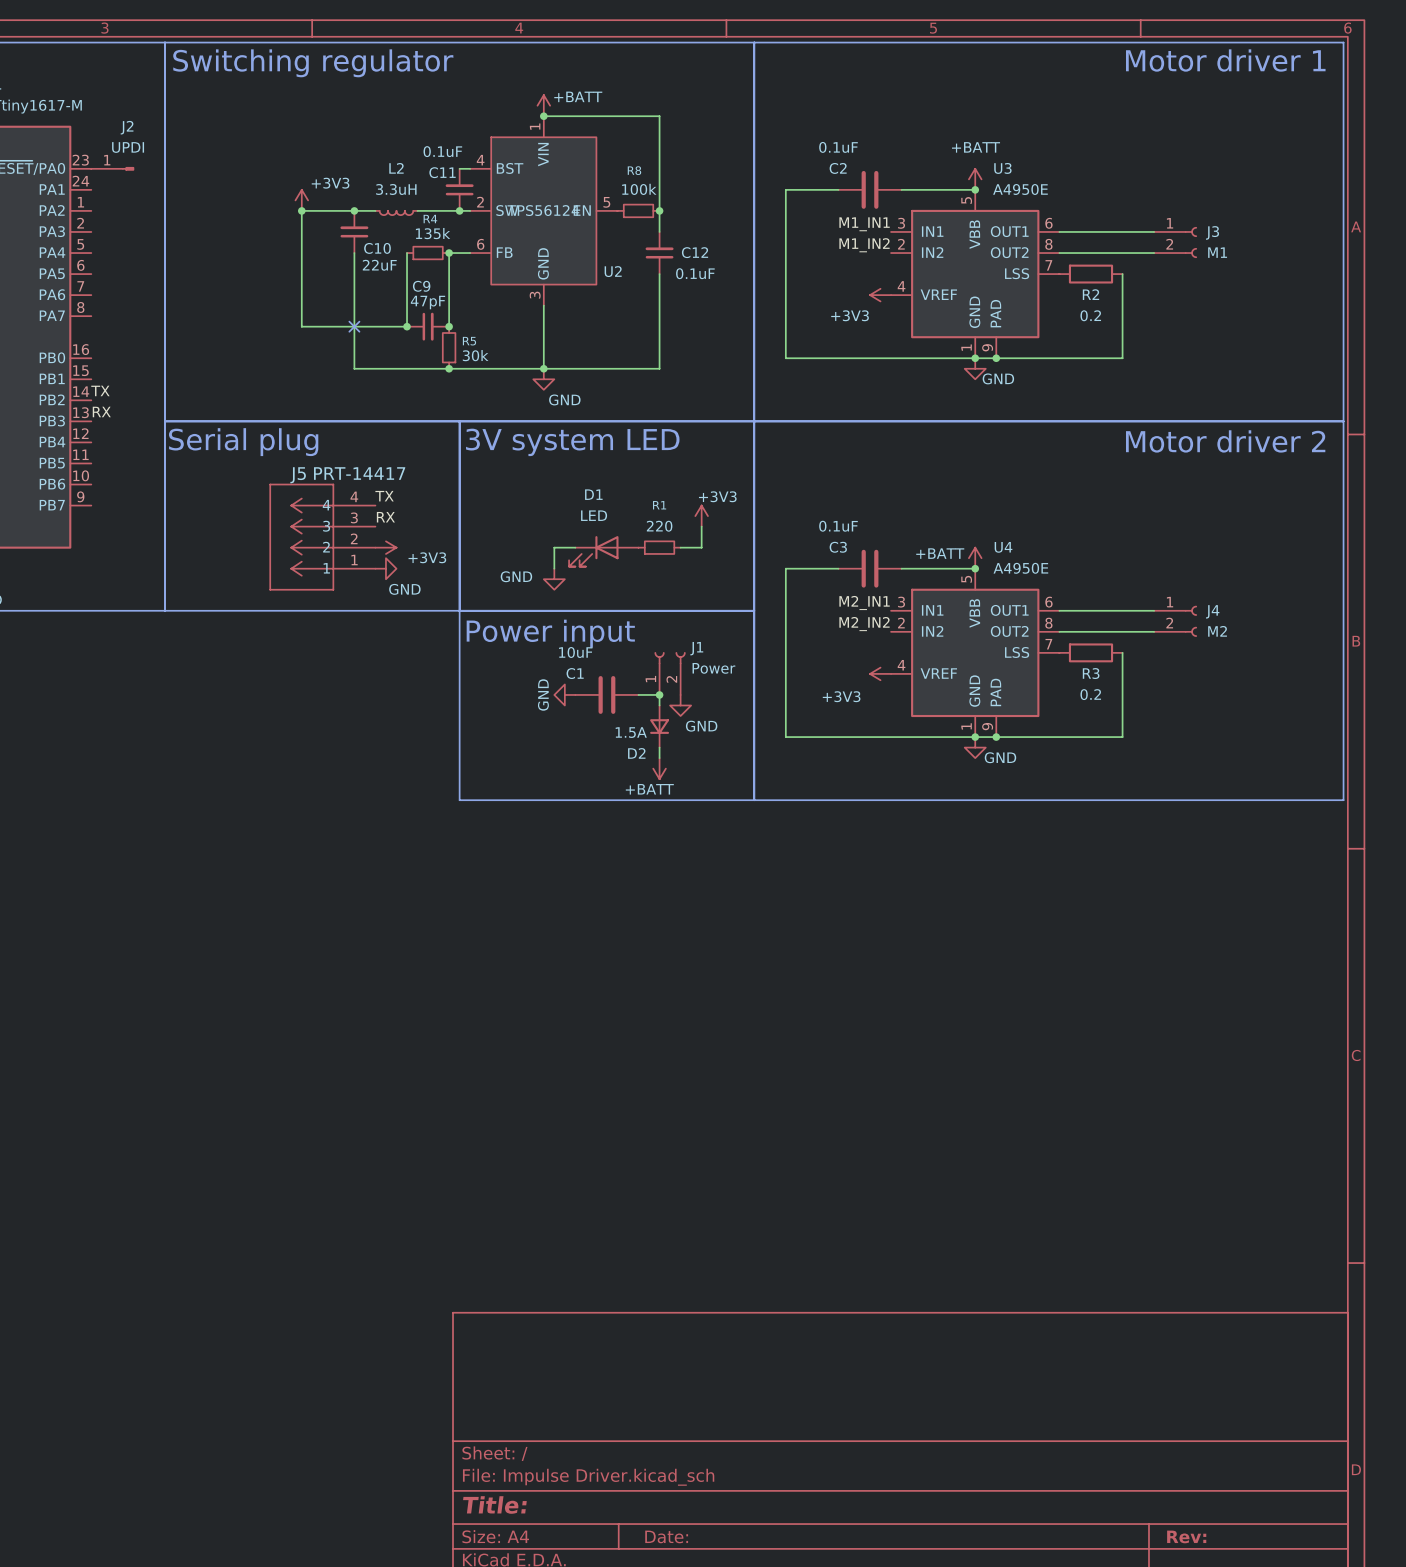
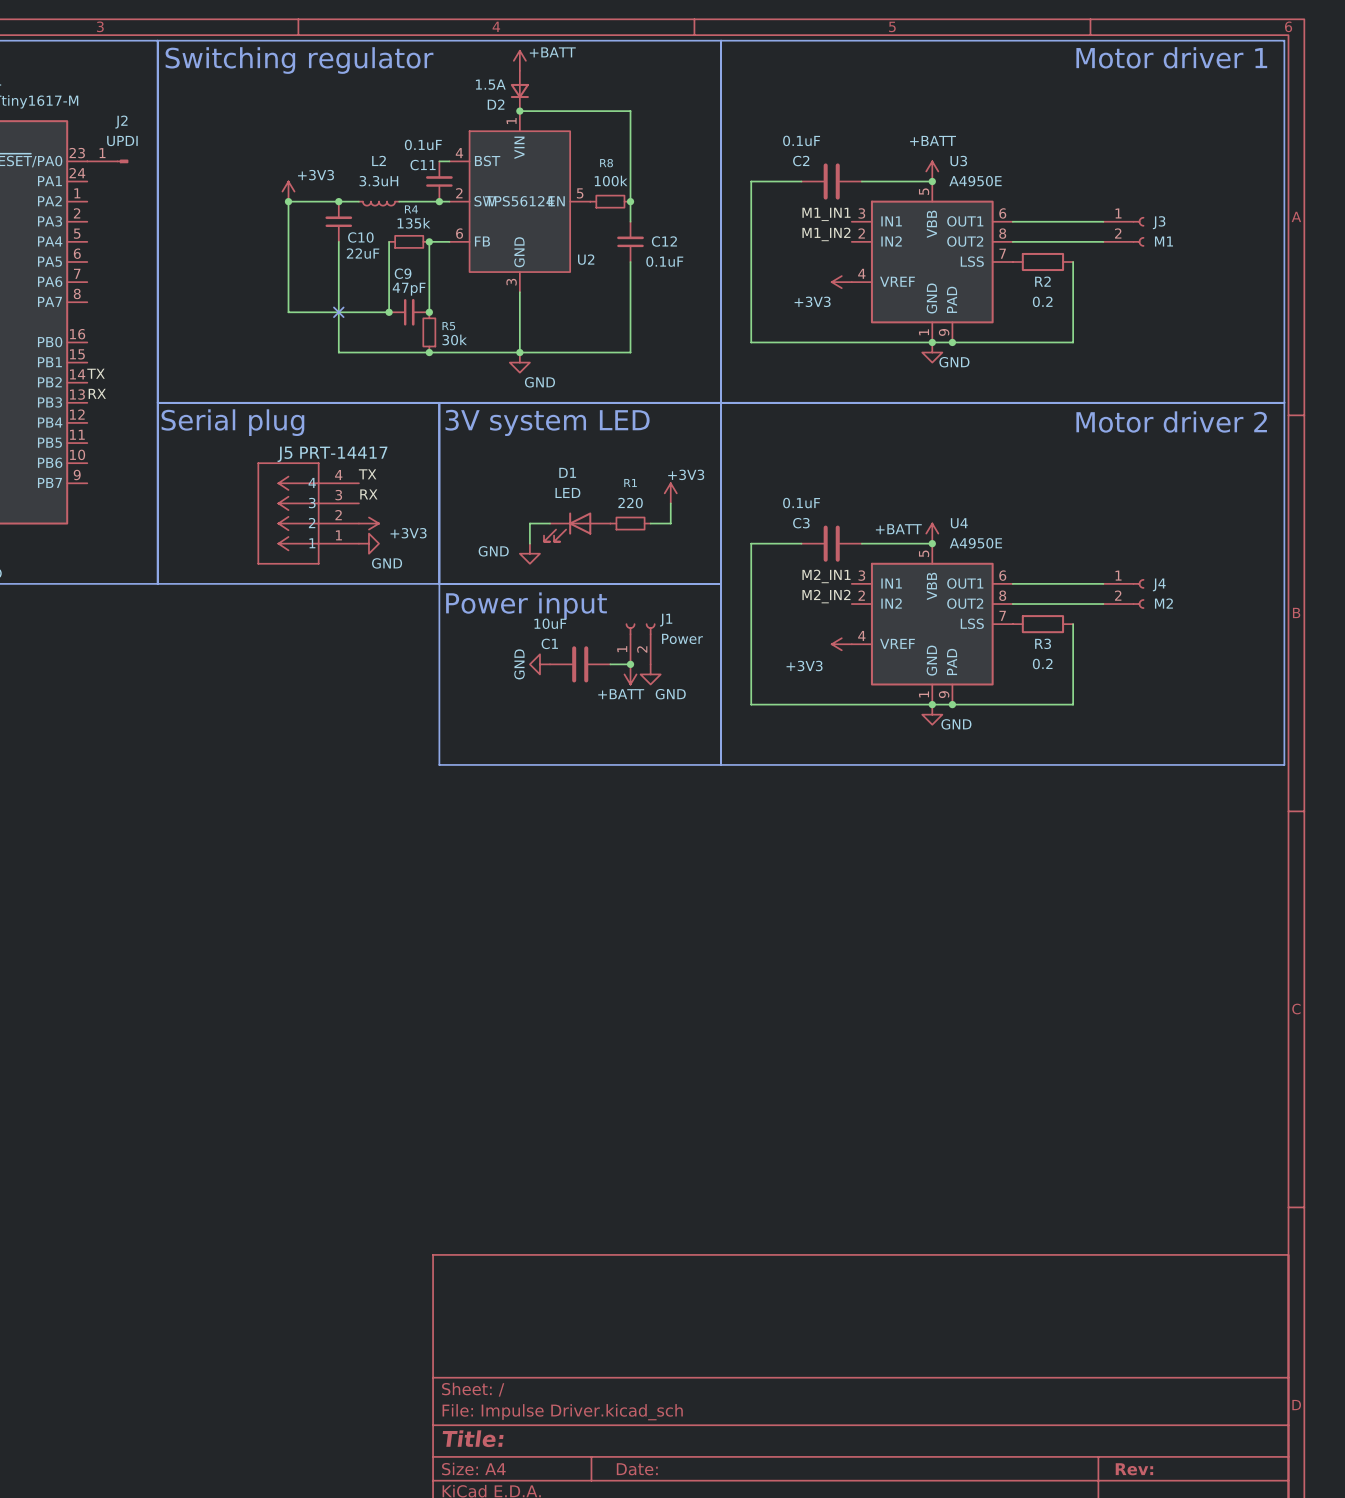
power symbol position: +BATT (543, 105) -> +BATT (519, 60)
D2 position: (659, 726) -> (519, 90)
D2 value position: 1.5A (631, 732) -> 1.5A (490, 84)
wire: (659, 747) (659, 758) -> none
D2 name position: D2 (636, 753) -> D2 (496, 104)
power symbol position: +BATT (659, 768) -> +BATT (630, 674)

